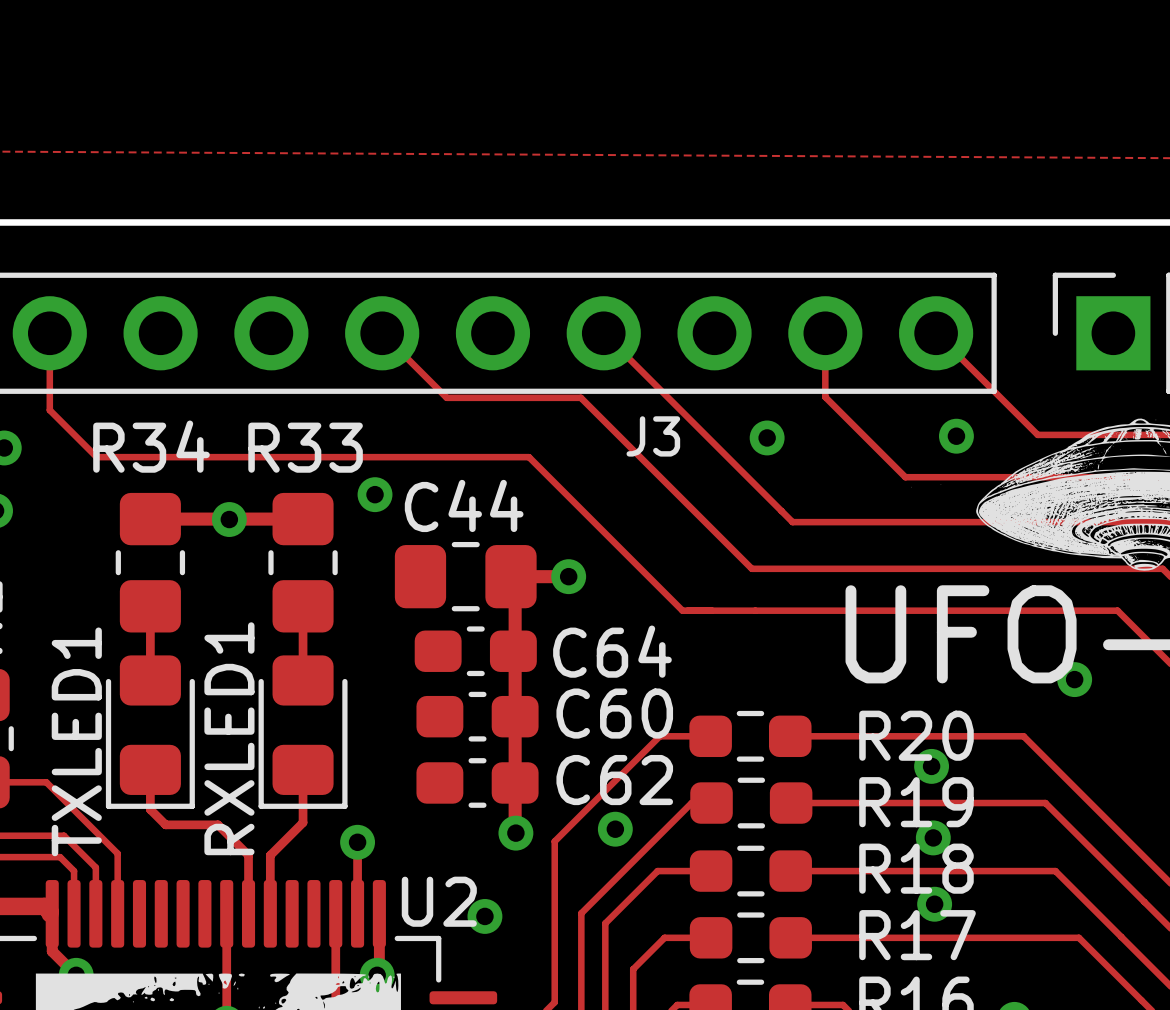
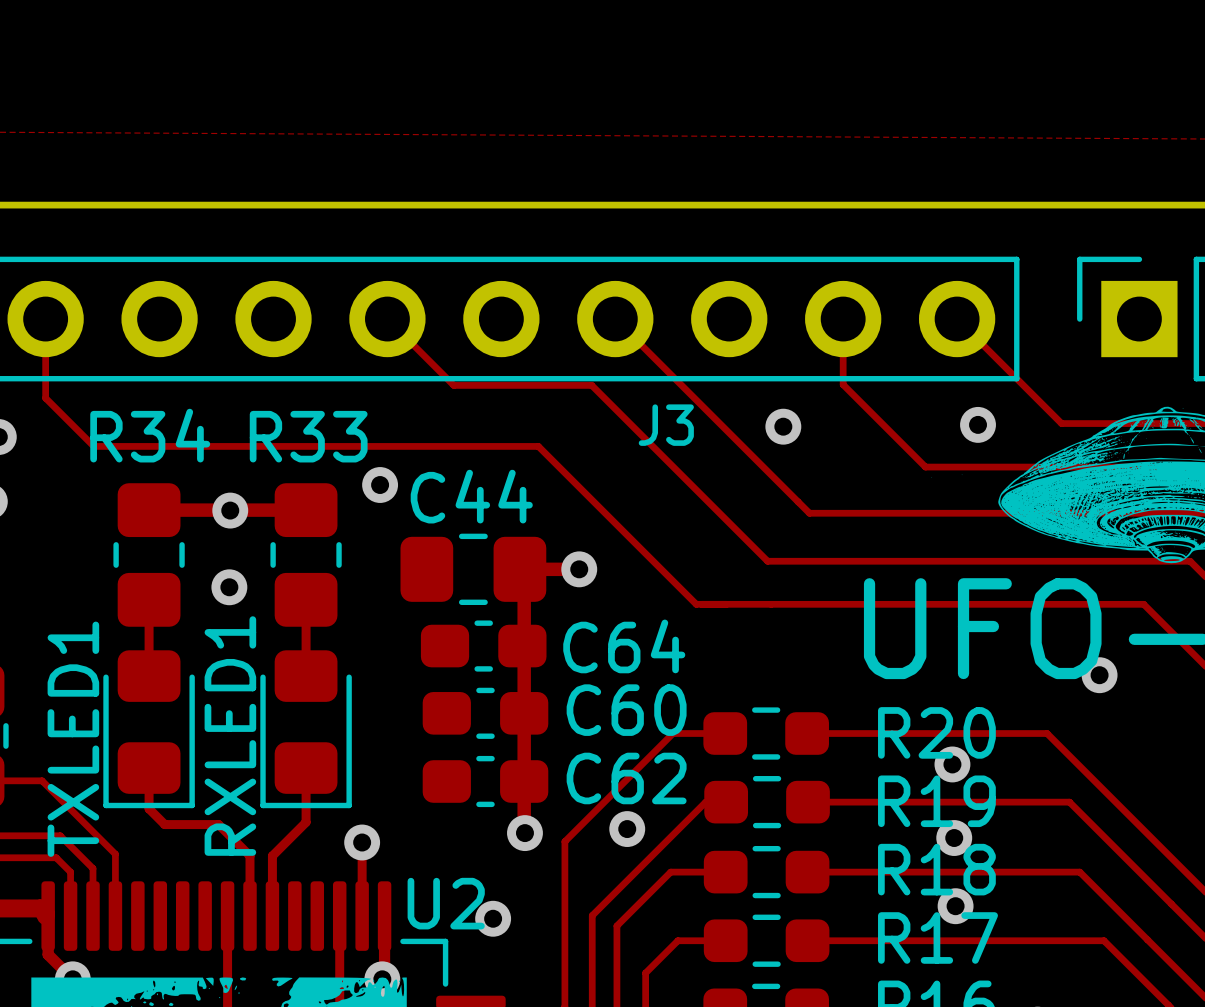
via: none -> (229, 587)

